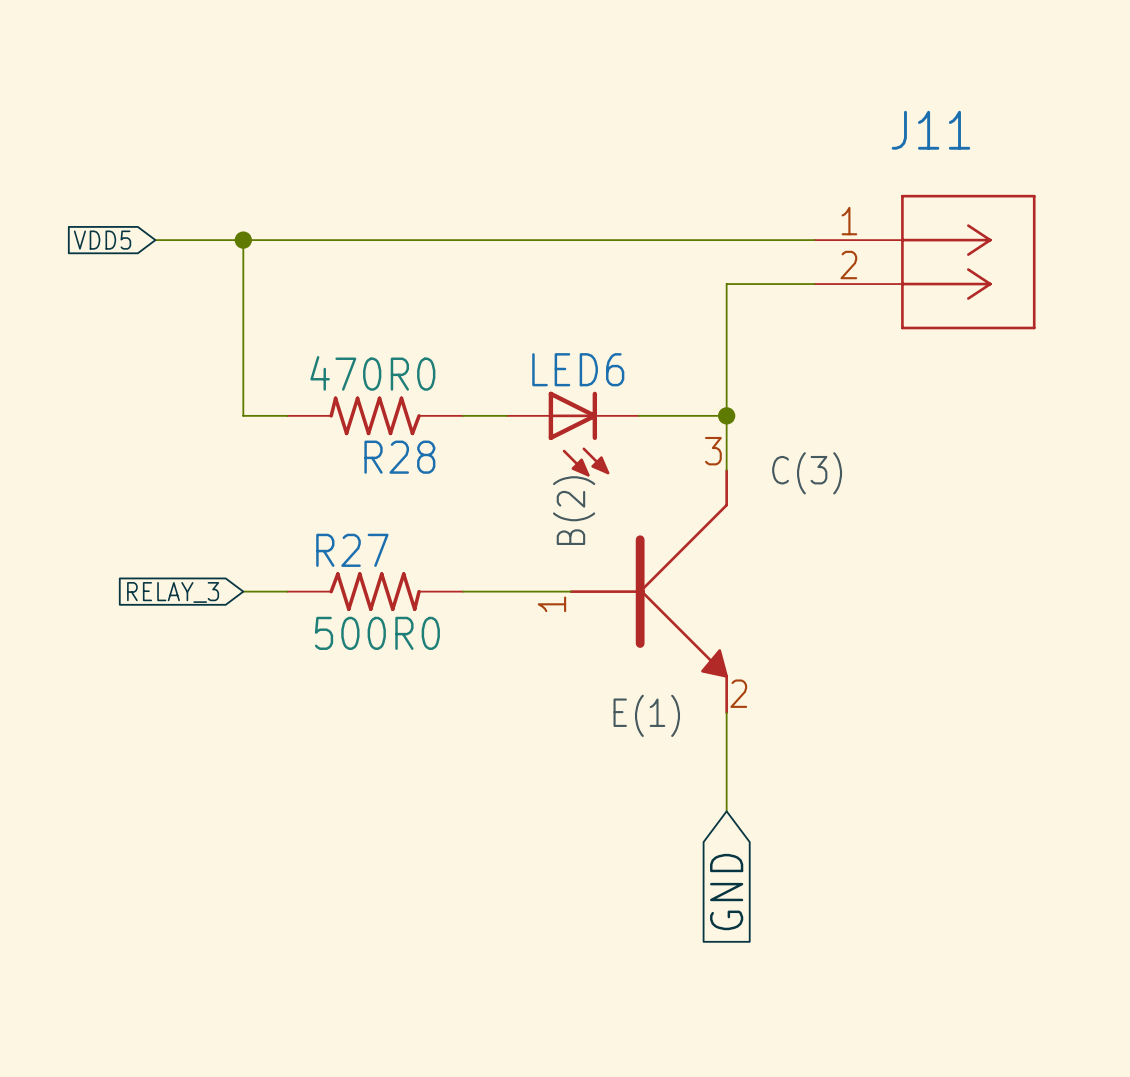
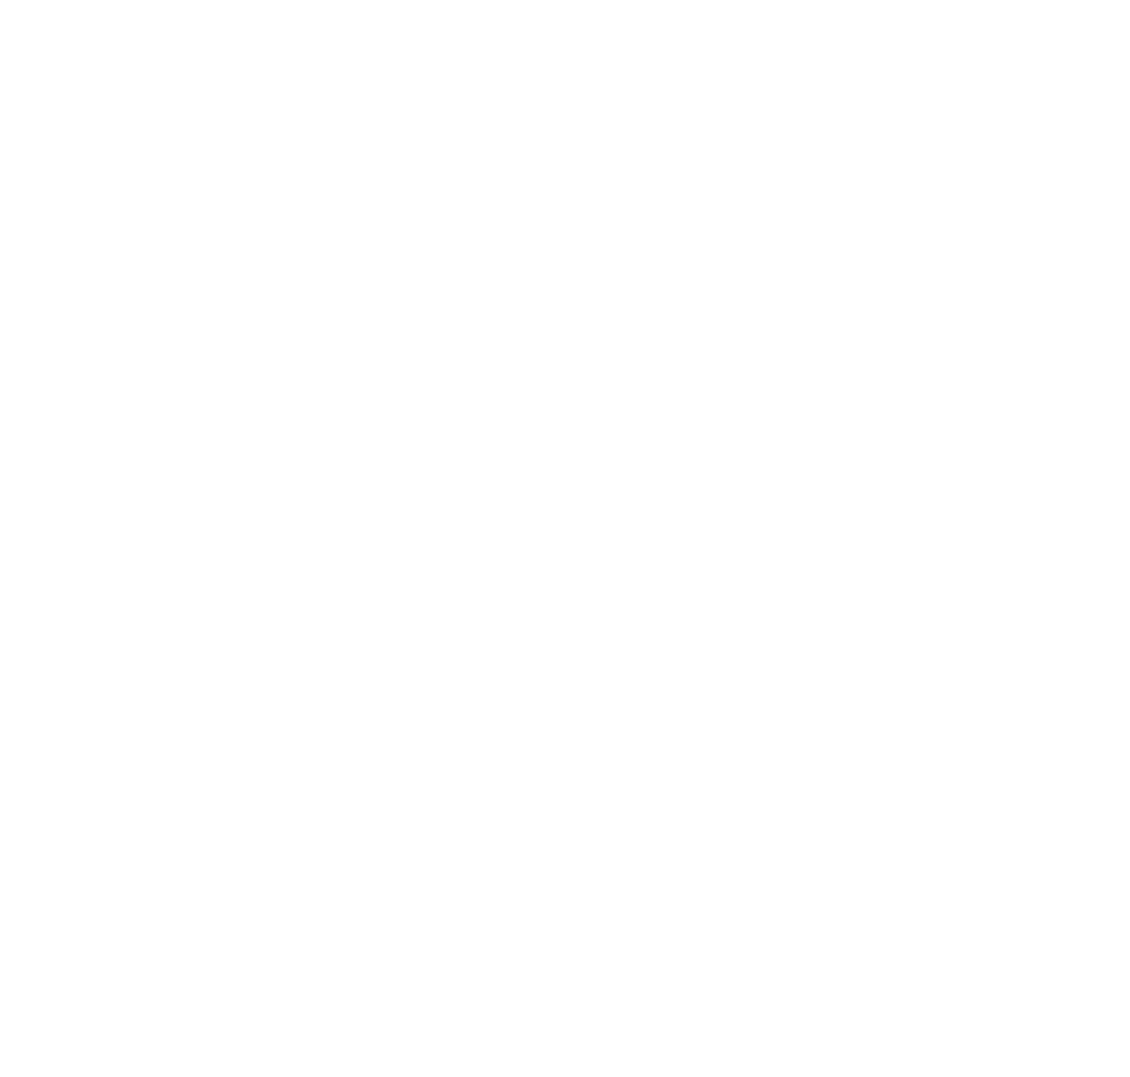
global label: VDD5 (102, 240) -> none
wire: (155, 240) (814, 240) -> none
wire: (243, 240) (243, 415) (287, 415) -> none
junction: (243, 240) -> none
J11: (925, 262) -> none
wire: (814, 284) (726, 284) (726, 470) -> none
R28: 470R0 (375, 415) -> none
wire: (463, 415) (506, 415) -> none
wire: (638, 415) (726, 415) -> none
junction: (726, 415) -> none
LED6: (572, 434) -> none
wire: (243, 591) (287, 591) -> none
R27: 500R0 (375, 591) -> none
wire: (463, 591) (570, 591) -> none
part: (648, 591) -> none
global label: RELAY_3 (173, 592) -> none
wire: (726, 712) (726, 811) -> none
global label: GND (726, 892) -> none

